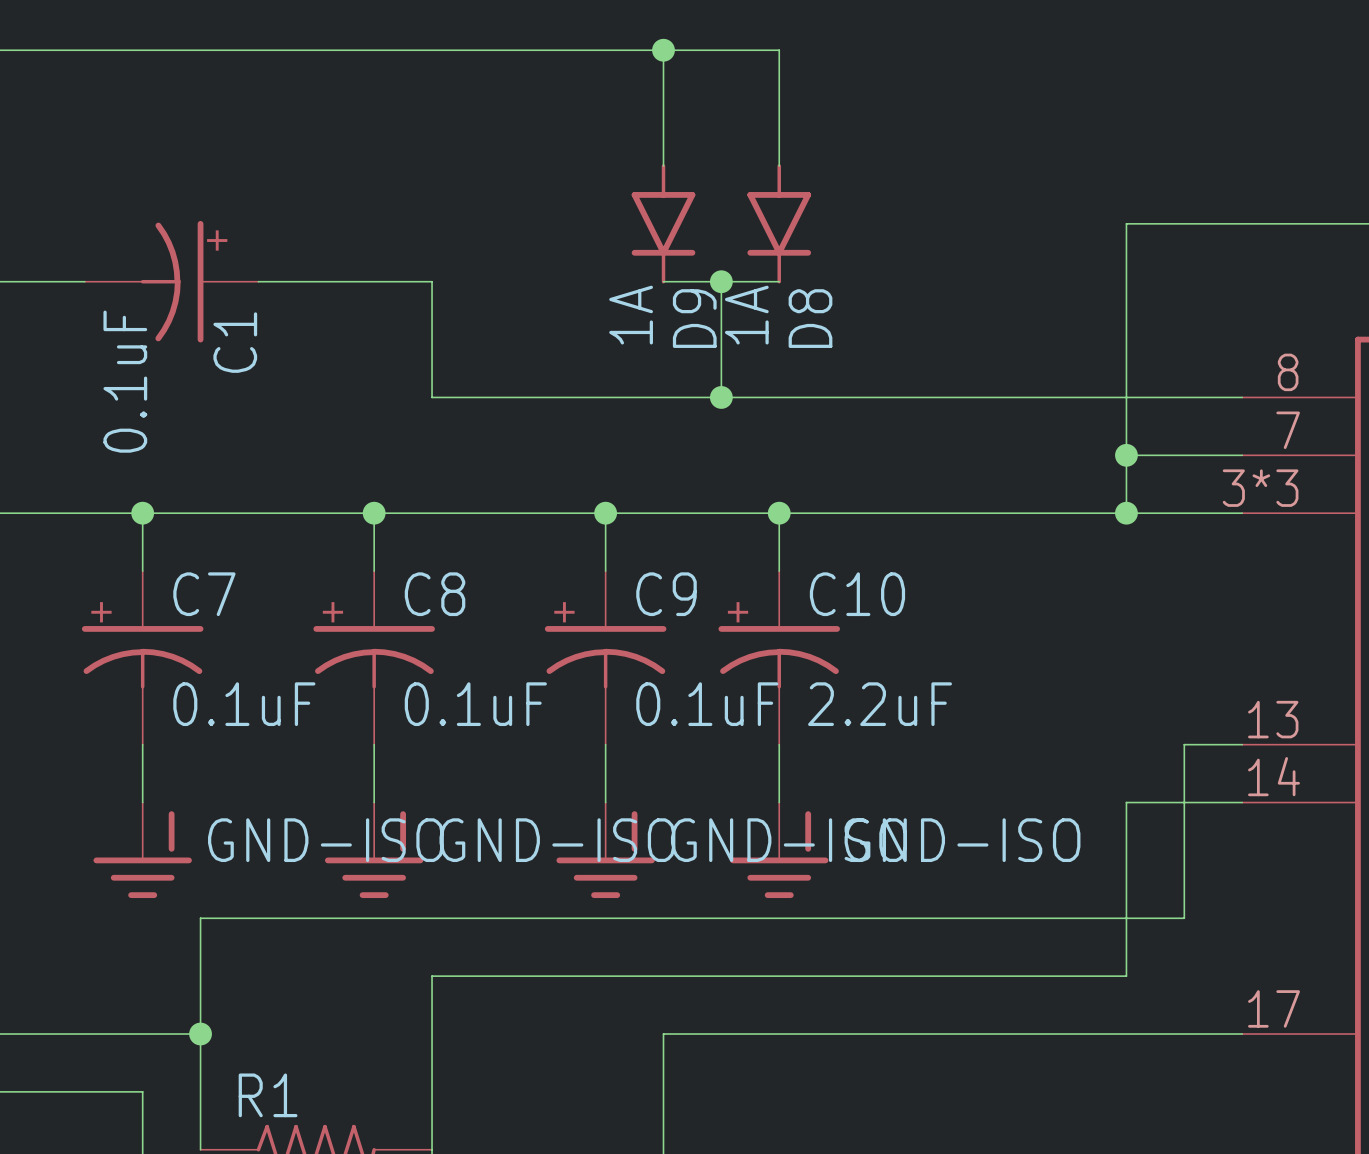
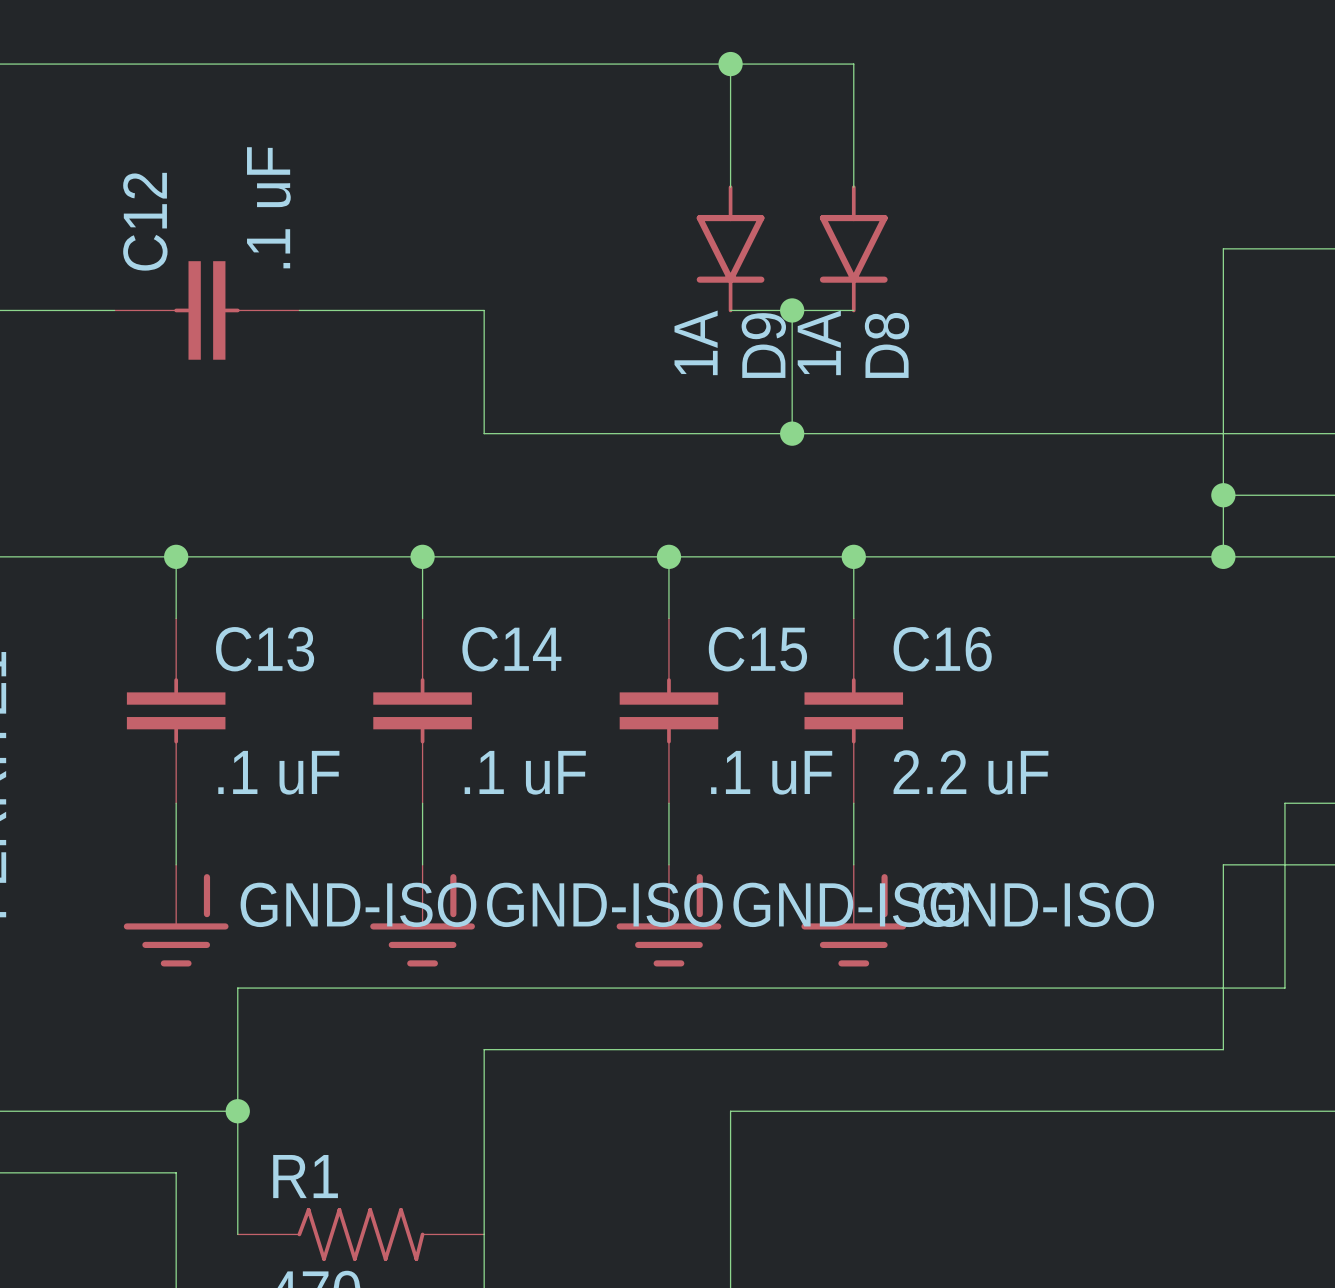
C1: 0.1uF (171, 281) -> none
C12: none -> .1 uF (206, 310)
C7: 0.1uF (142, 657) -> none
C13: none -> .1 uF (176, 710)
C8: 0.1uF (374, 657) -> none
C14: none -> .1 uF (422, 710)
C9: 0.1uF (605, 657) -> none
C15: none -> .1 uF (668, 710)
C10: 2.2uF (779, 657) -> none
C16: none -> 2.2 uF (853, 710)

